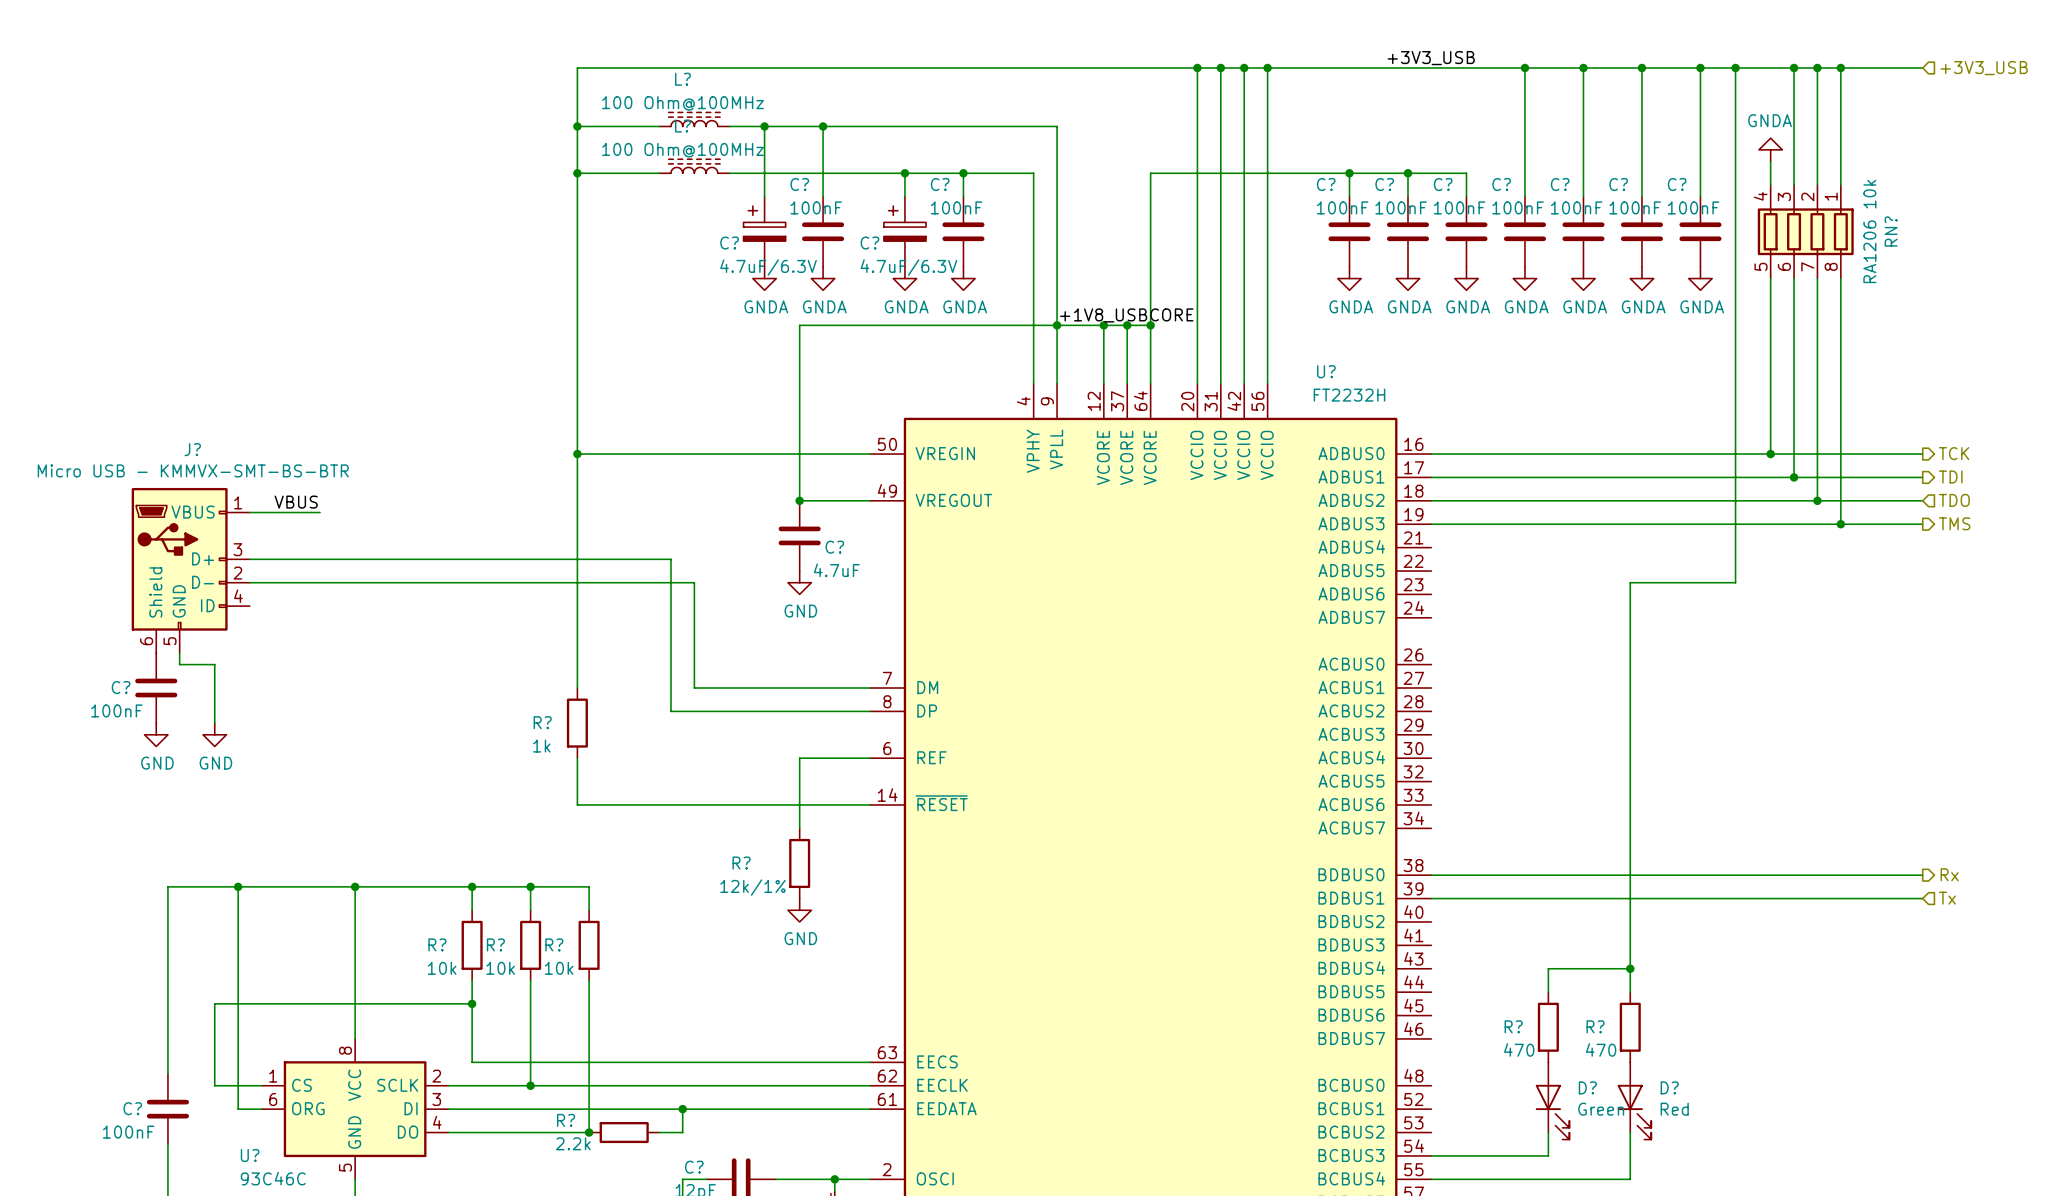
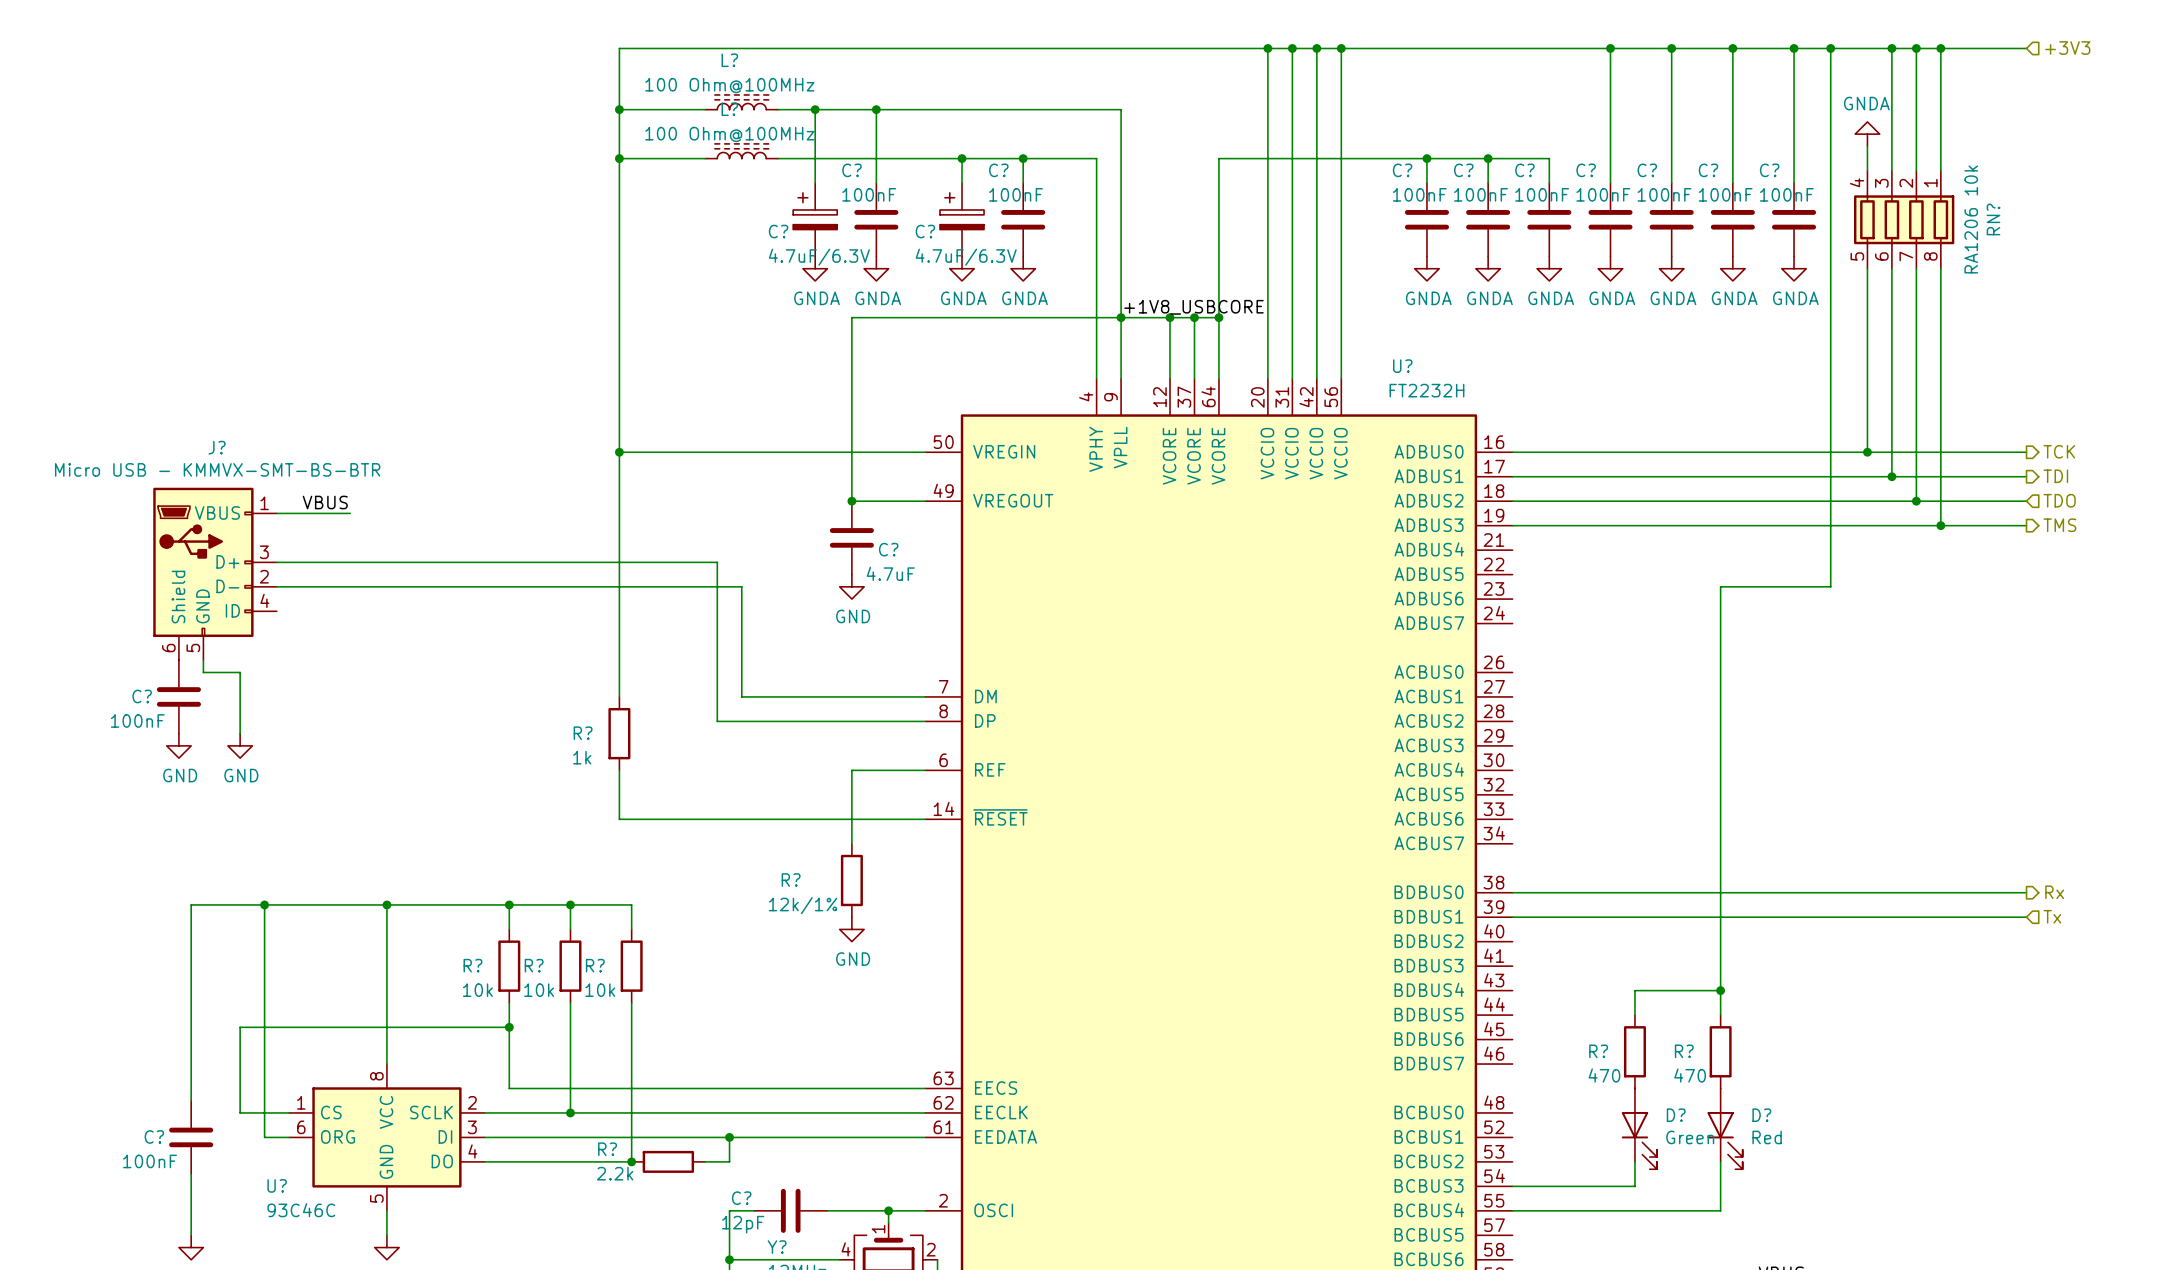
label: +3V3_USB (1431, 58) -> none
hierarchical label: +3V3_USB (1984, 68) -> +3V3 (2067, 48)

